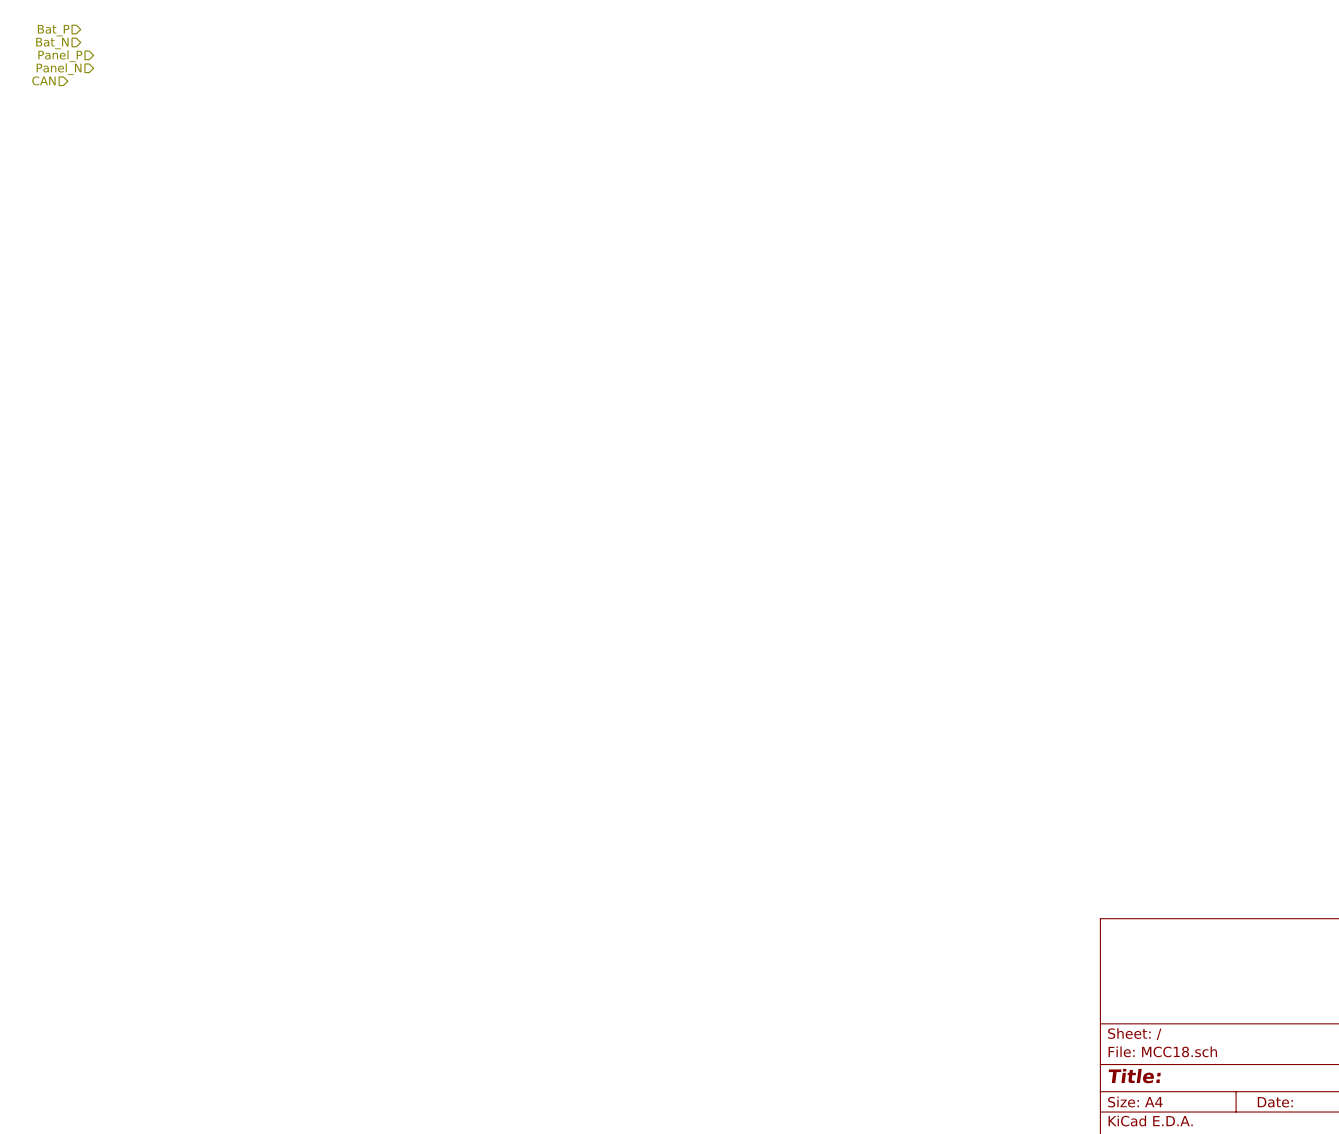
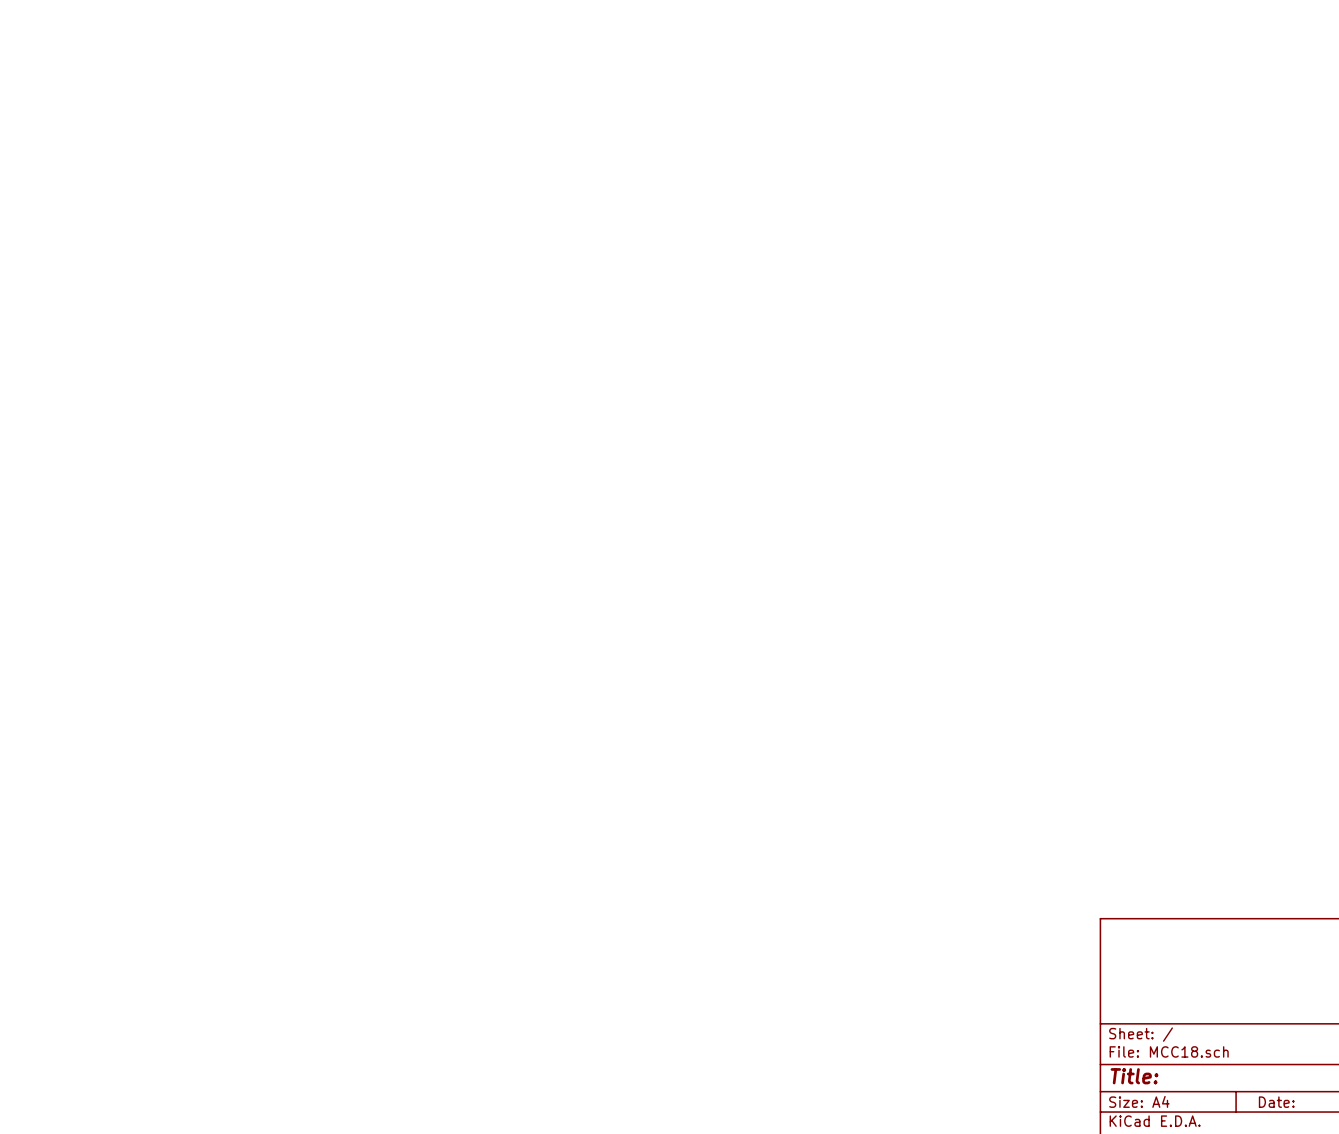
hierarchical label: Bat_P (53, 30) -> none
hierarchical label: Bat_N (52, 43) -> none
hierarchical label: Panel_P (60, 56) -> none
hierarchical label: Panel_N (59, 69) -> none
hierarchical label: CAN (43, 80) -> none

